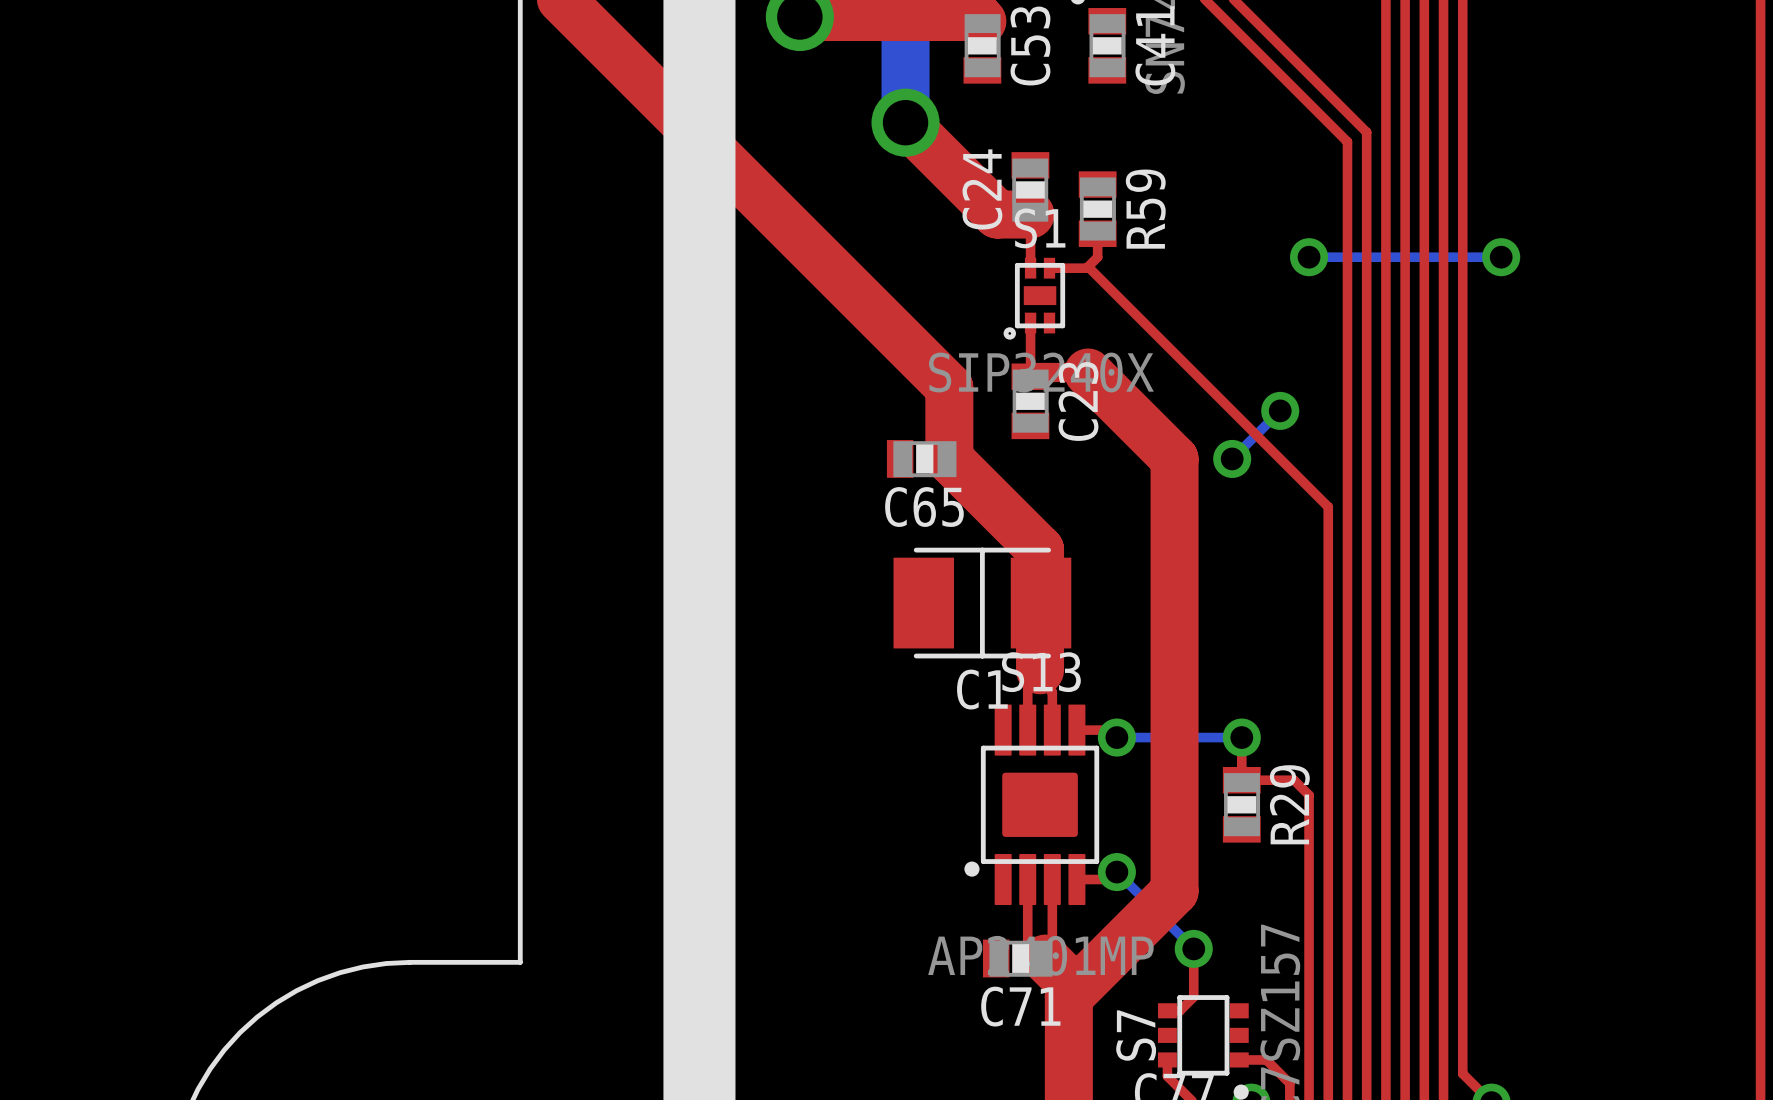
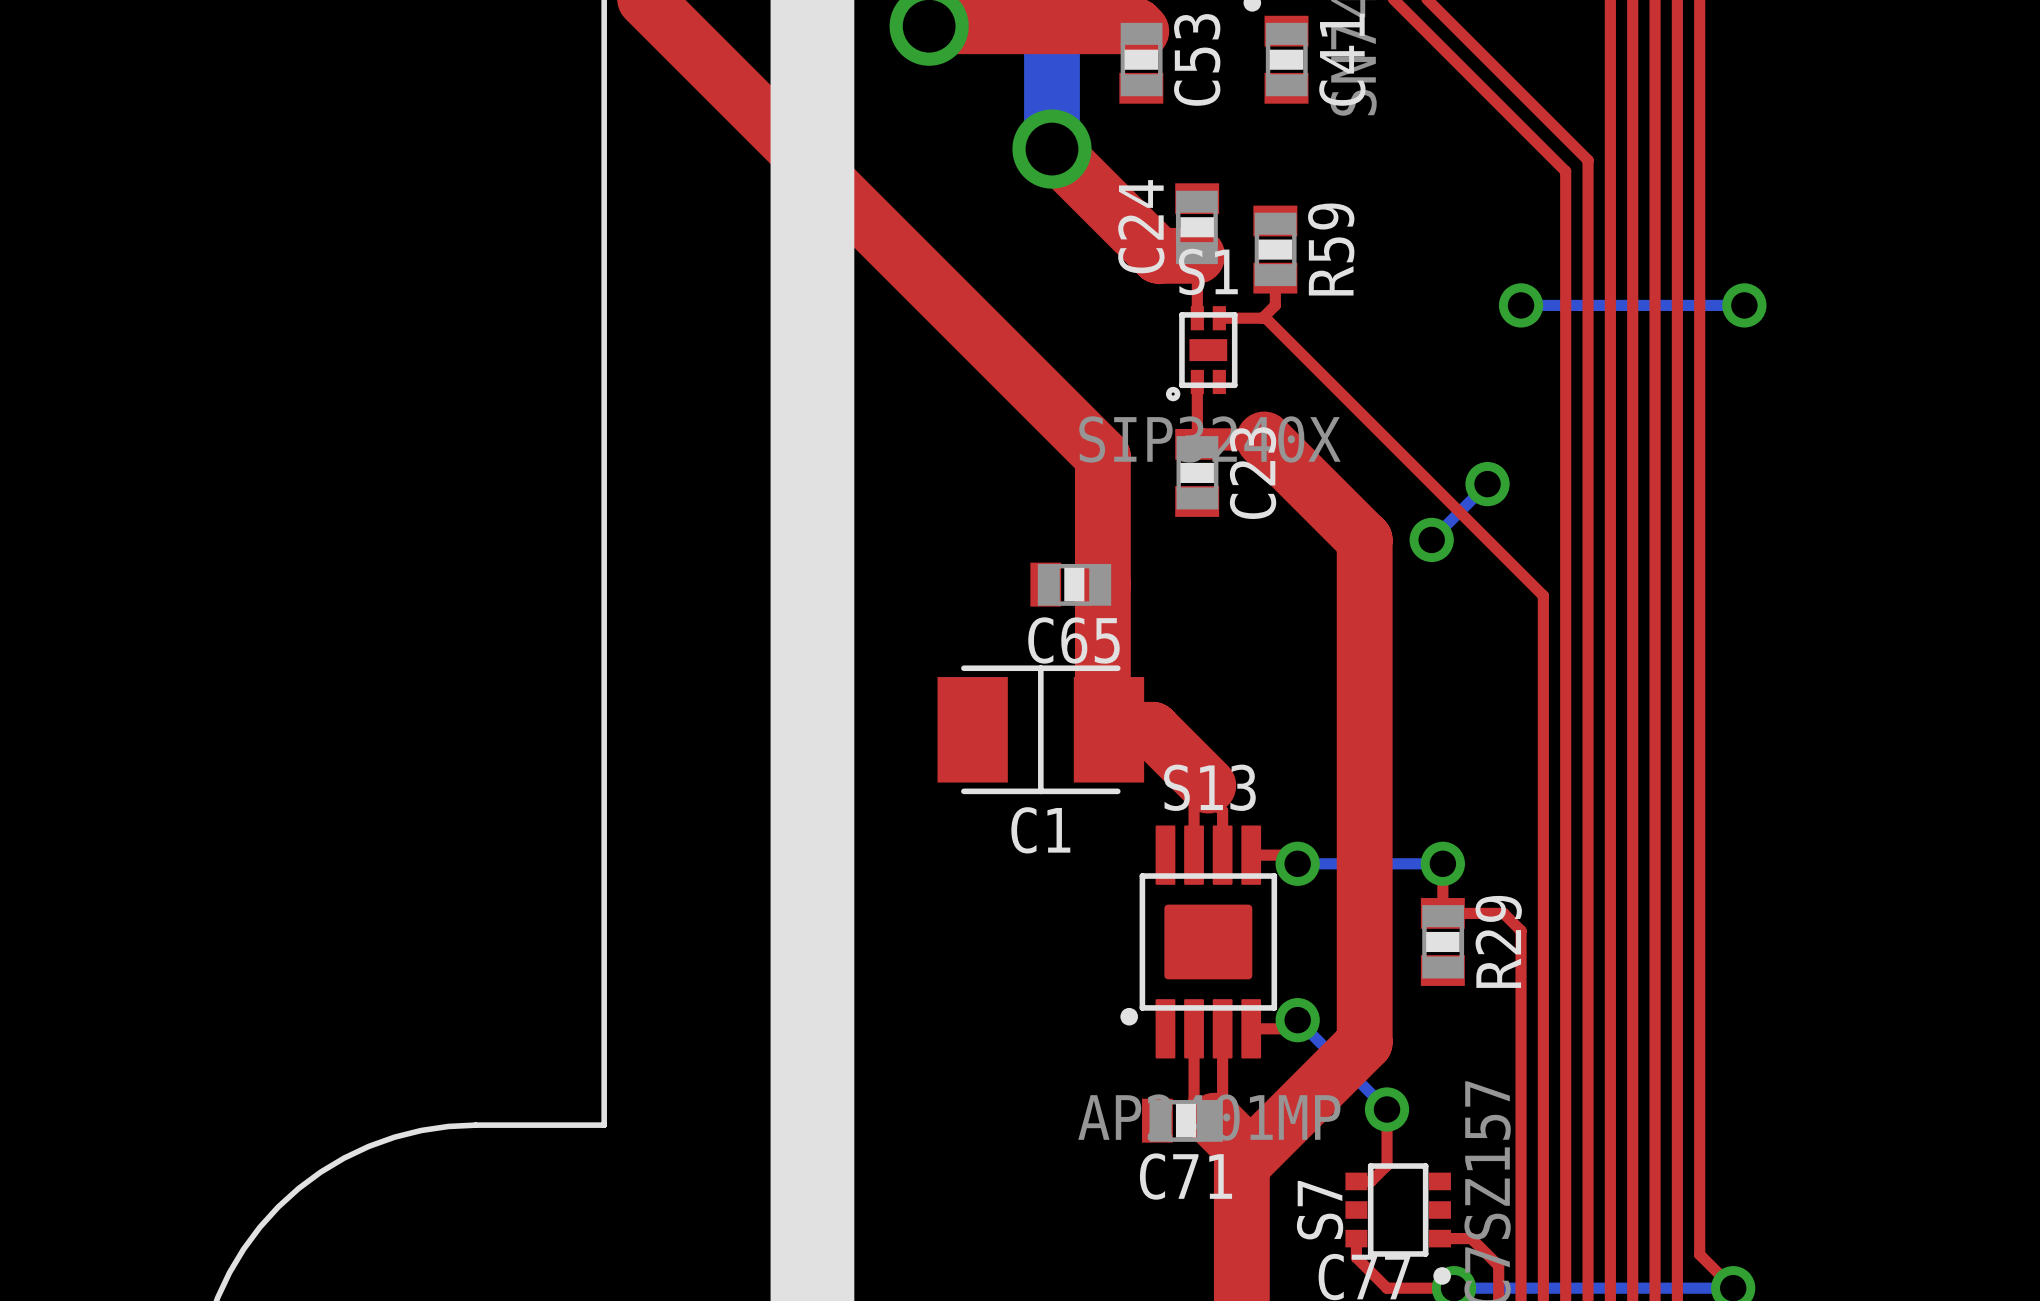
C65 position: (924, 458) -> (1074, 584)
top track: (949, 458) (1040, 549) (1040, 670) -> (1102, 539) (1102, 723) (1108, 729) (1152, 729) (1208, 785)
C1 position: (982, 603) -> (1040, 729)

